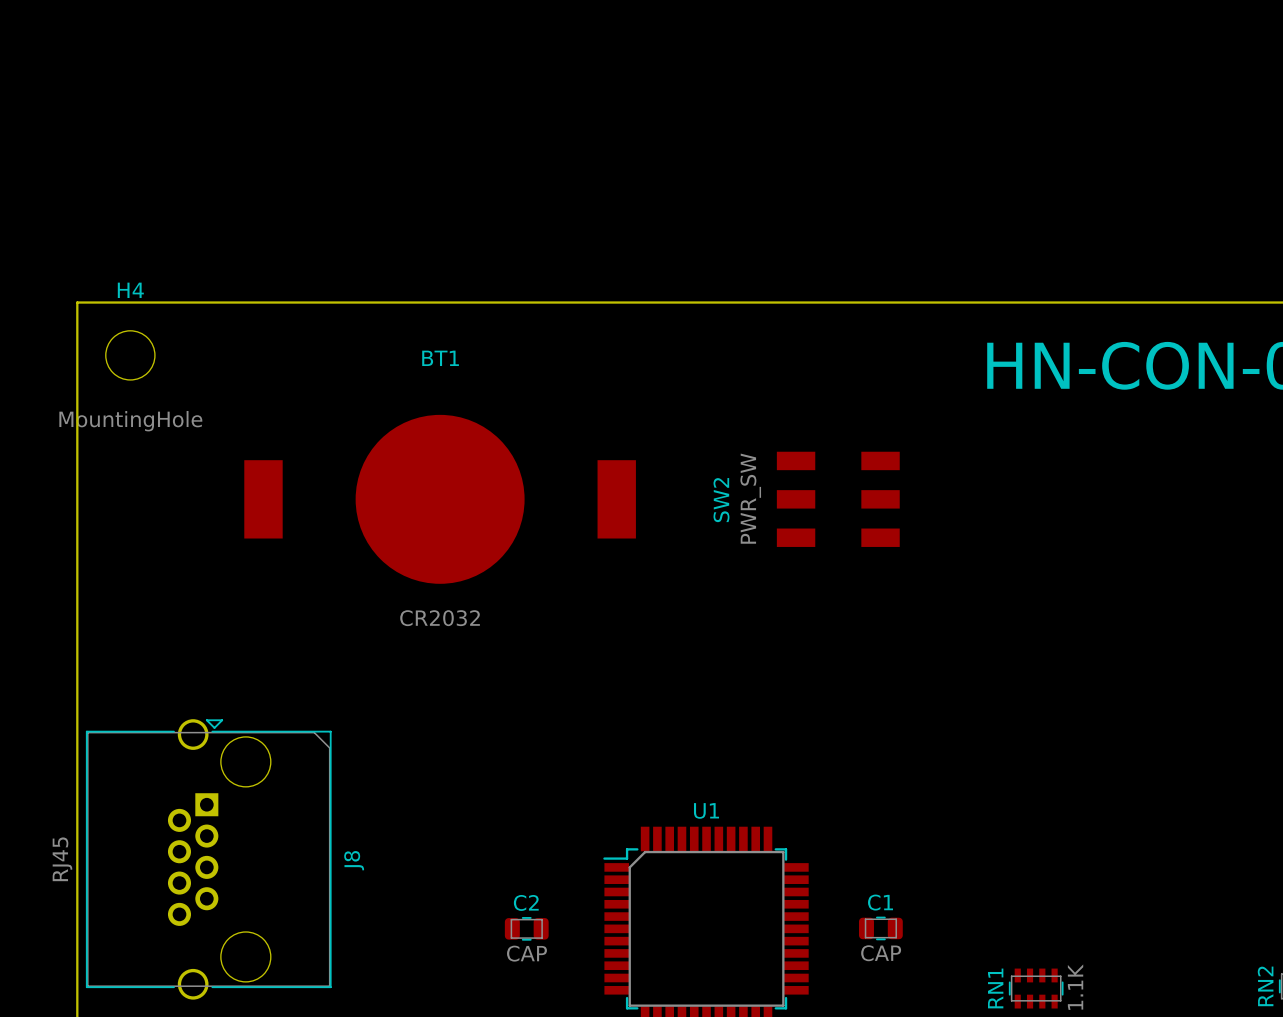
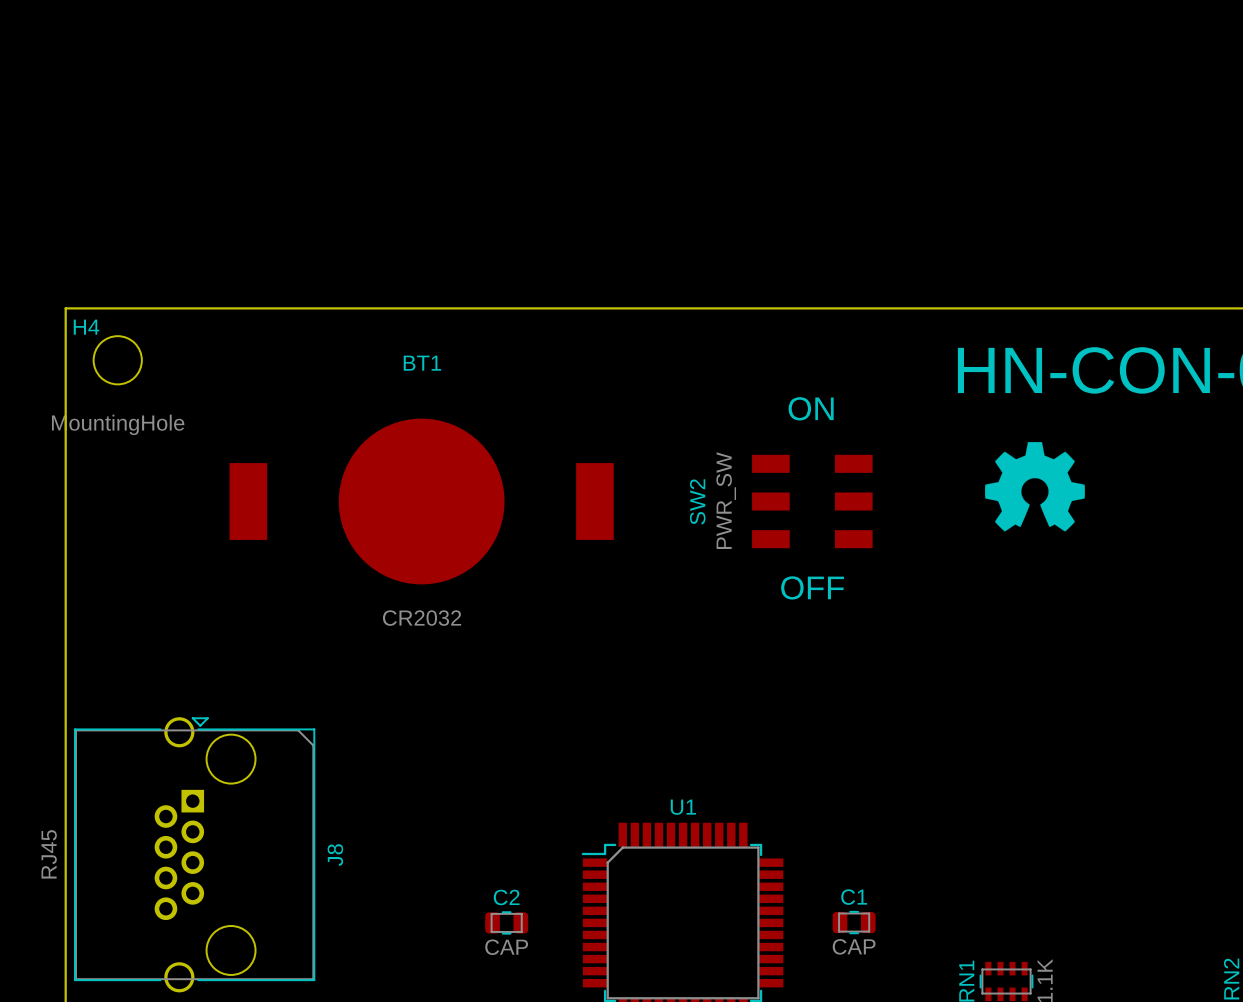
H4 name position: H4 (130, 290) -> H4 (86, 327)
text: none -> ON (811, 408)
drawing: none -> [984, 442, 1085, 532]
text: none -> OFF (812, 587)

